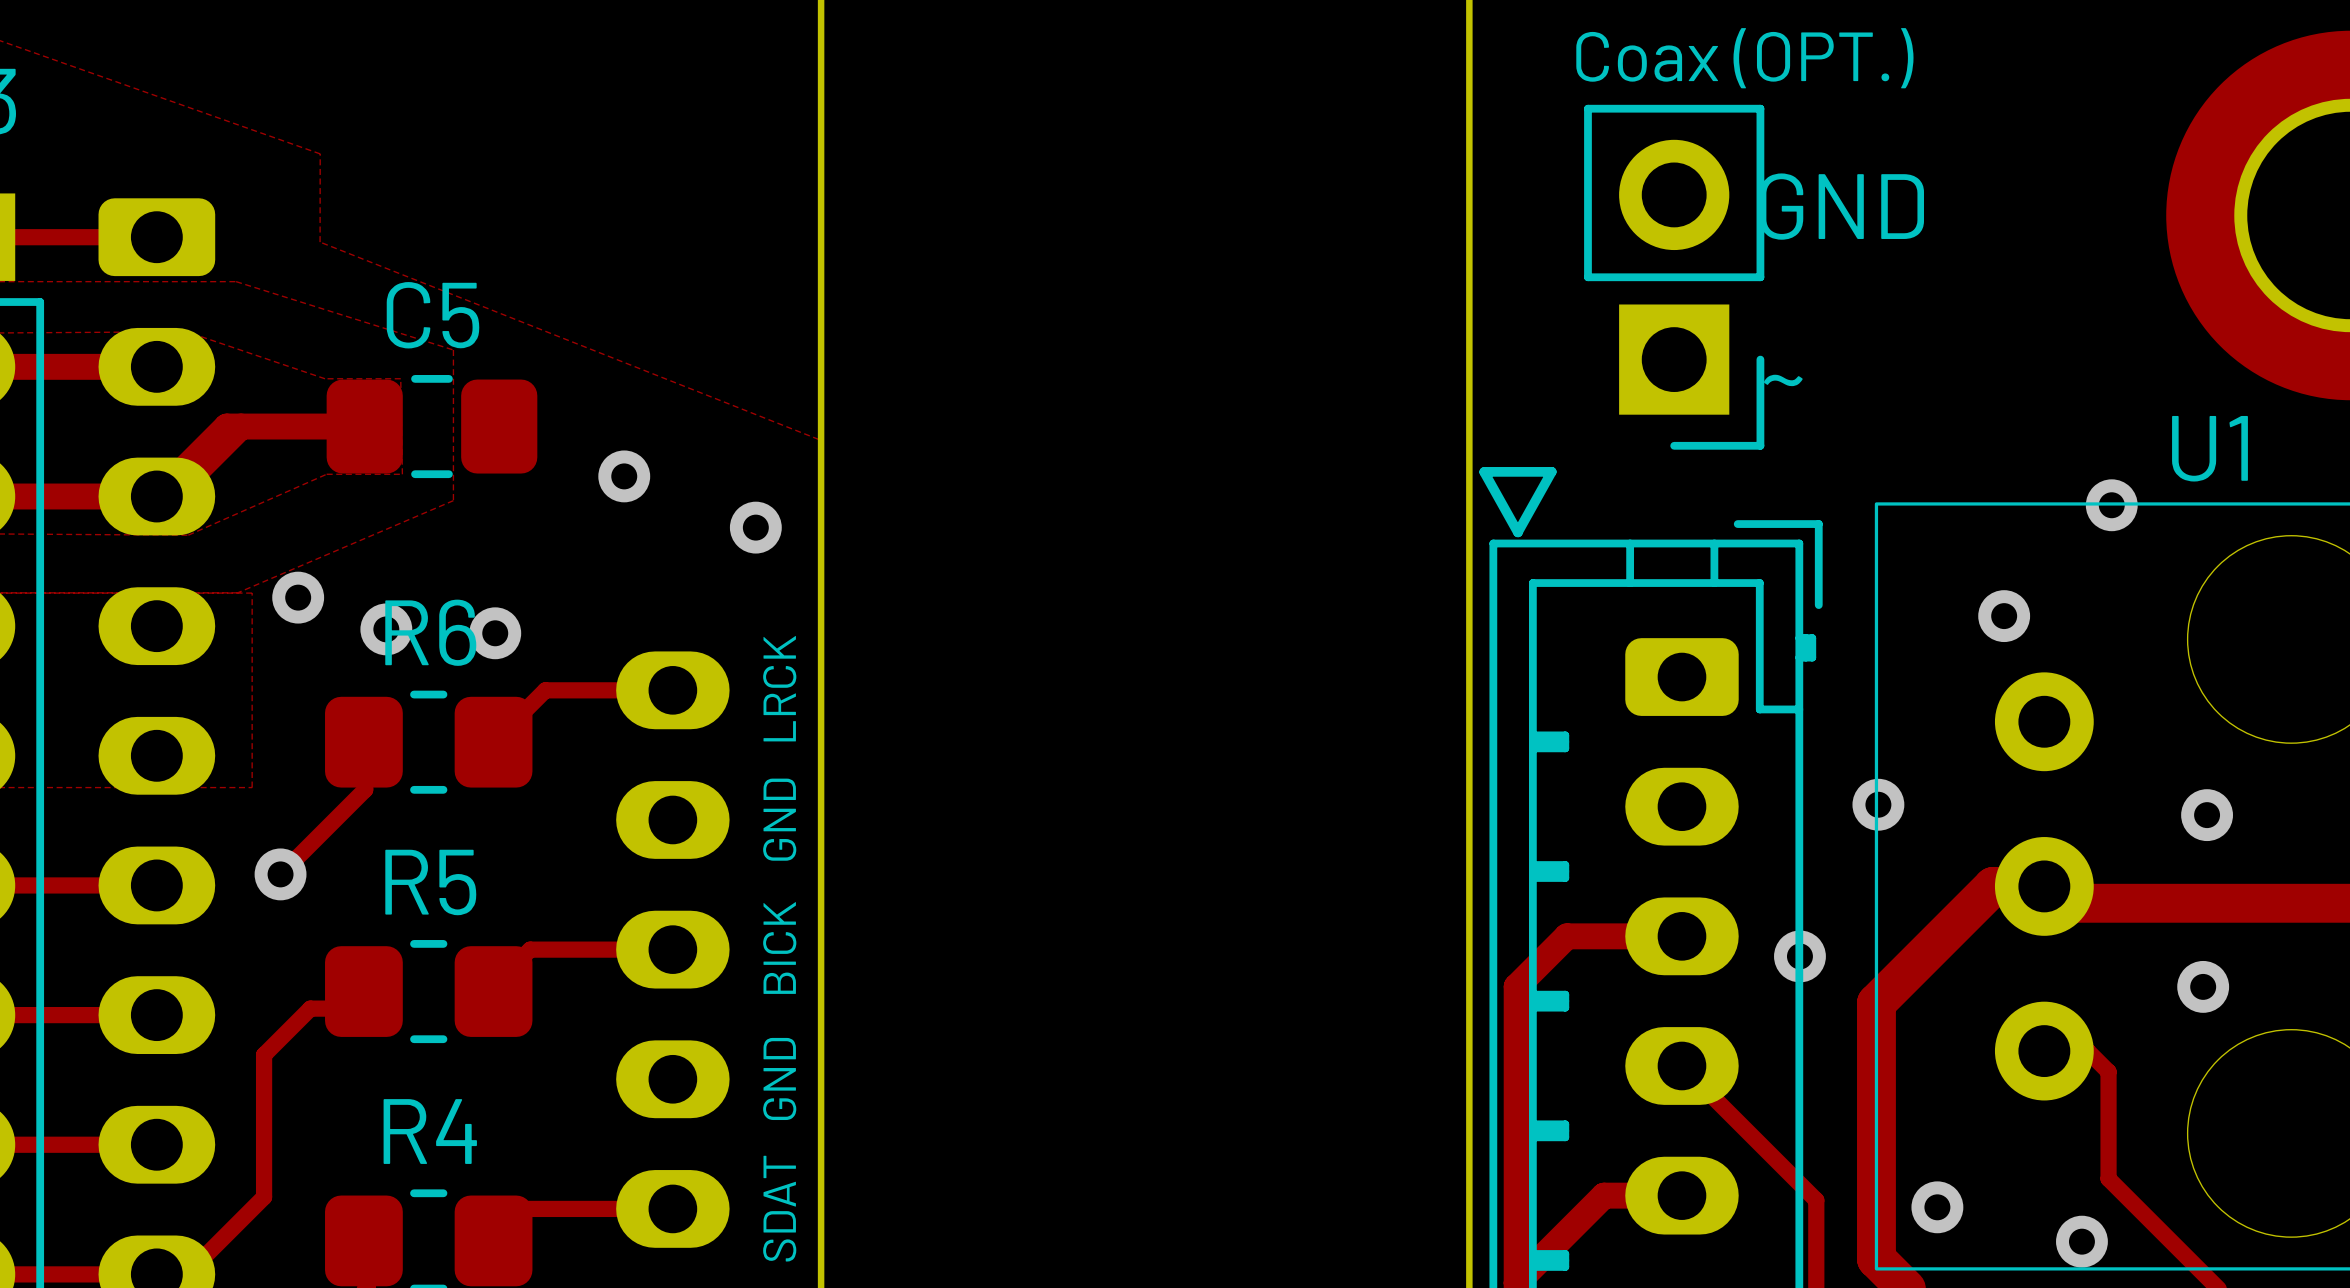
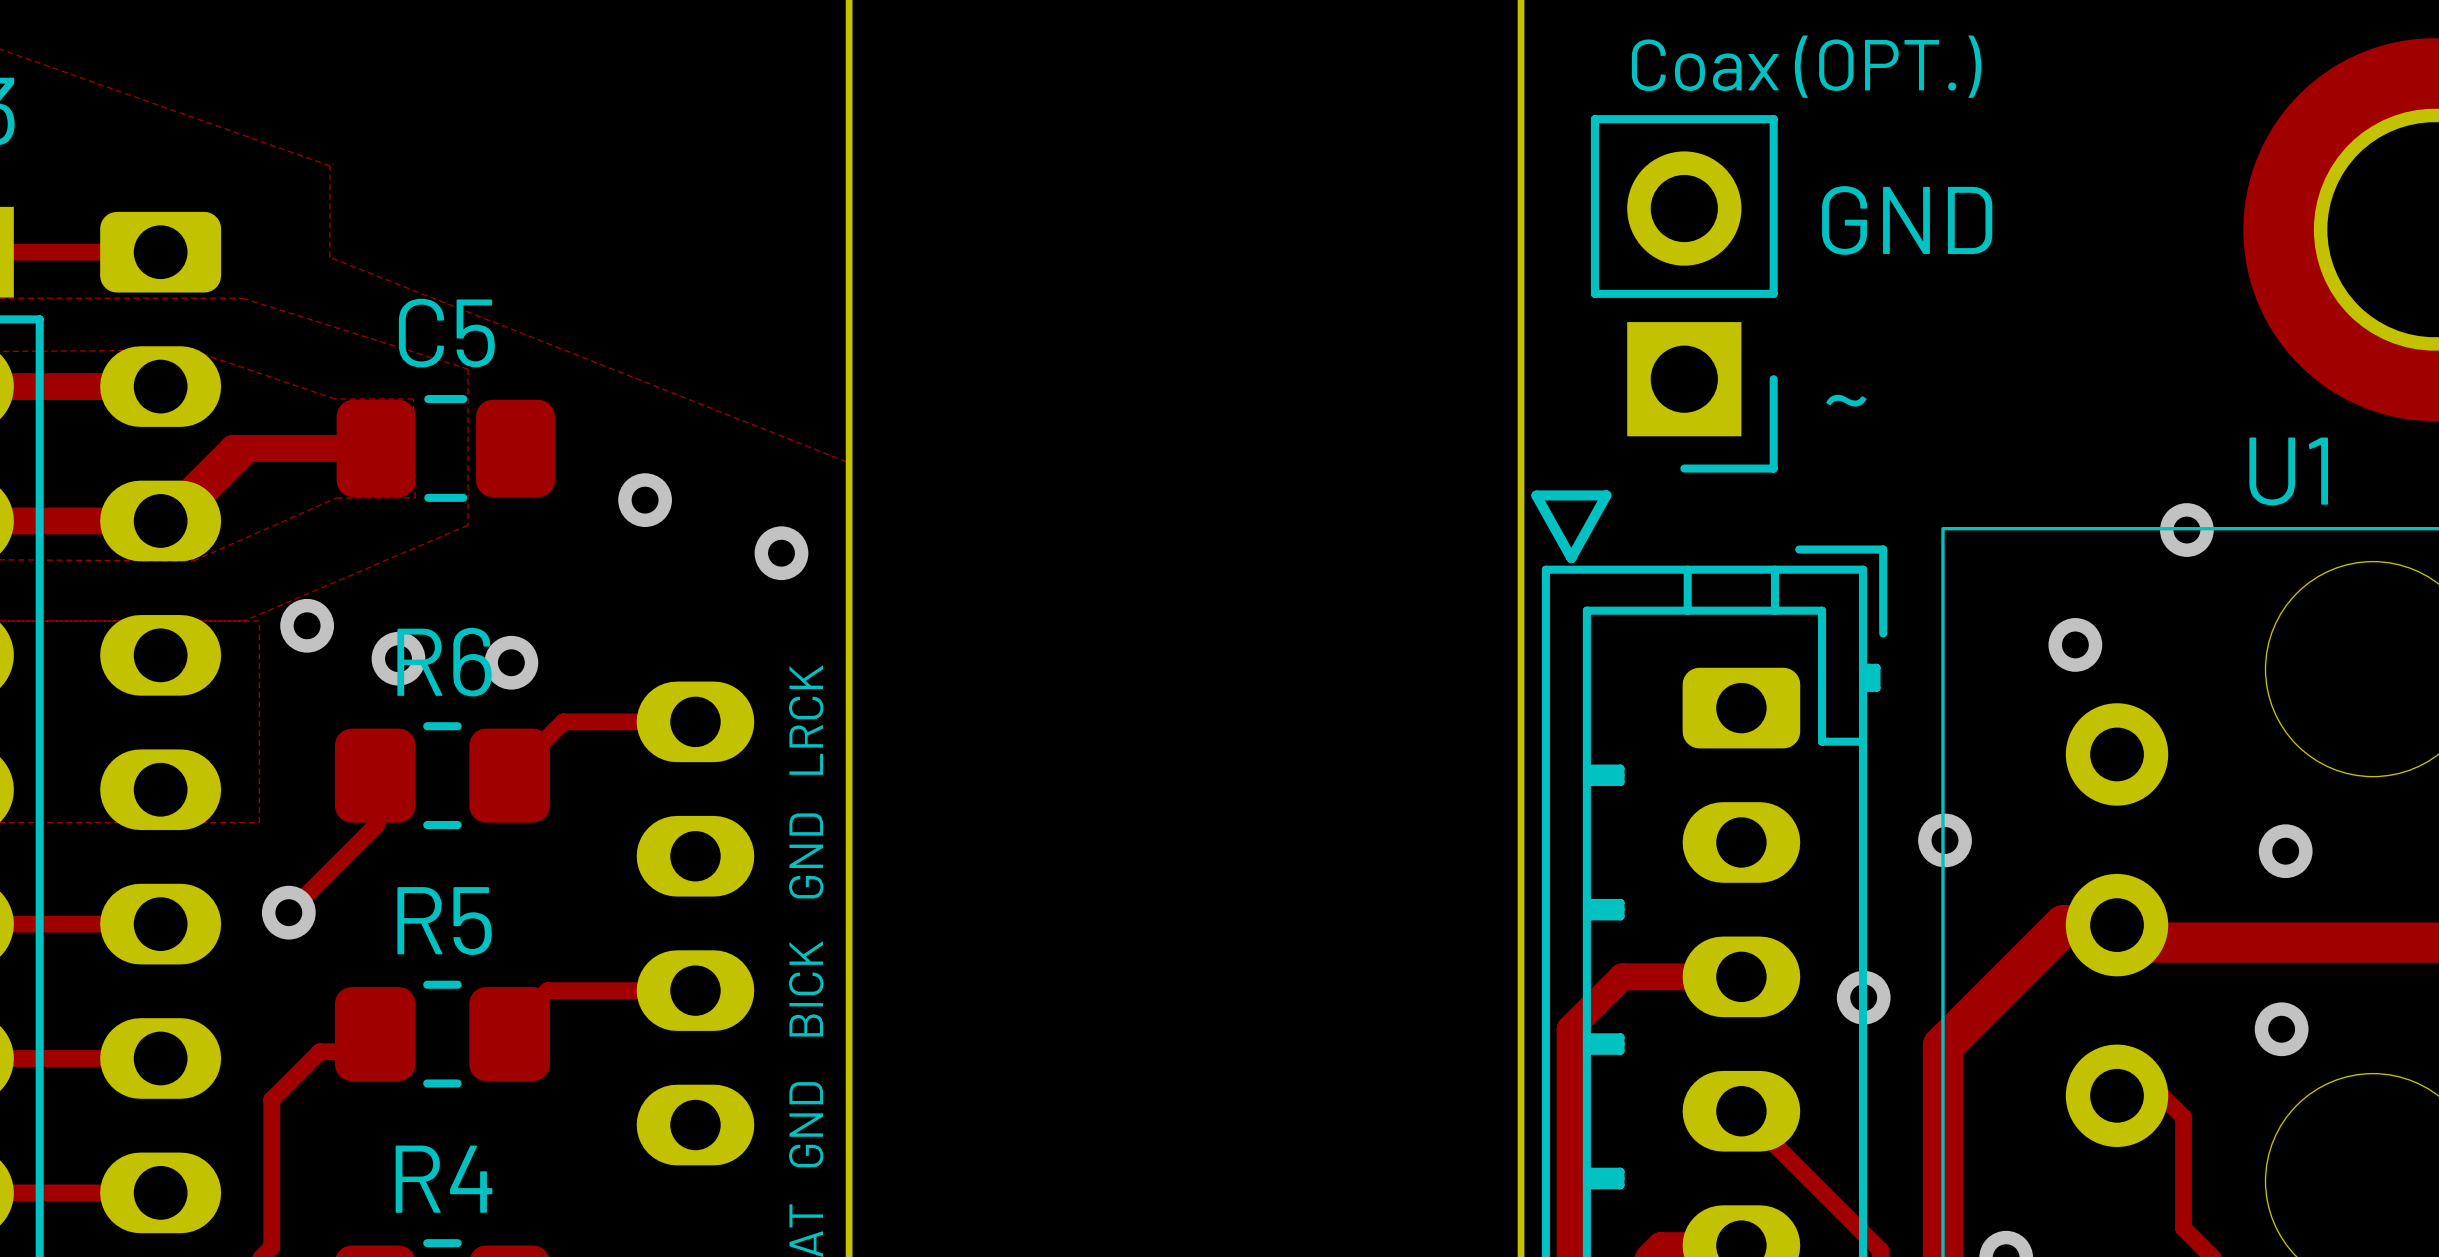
part position: (1674, 277) -> (1684, 293)

